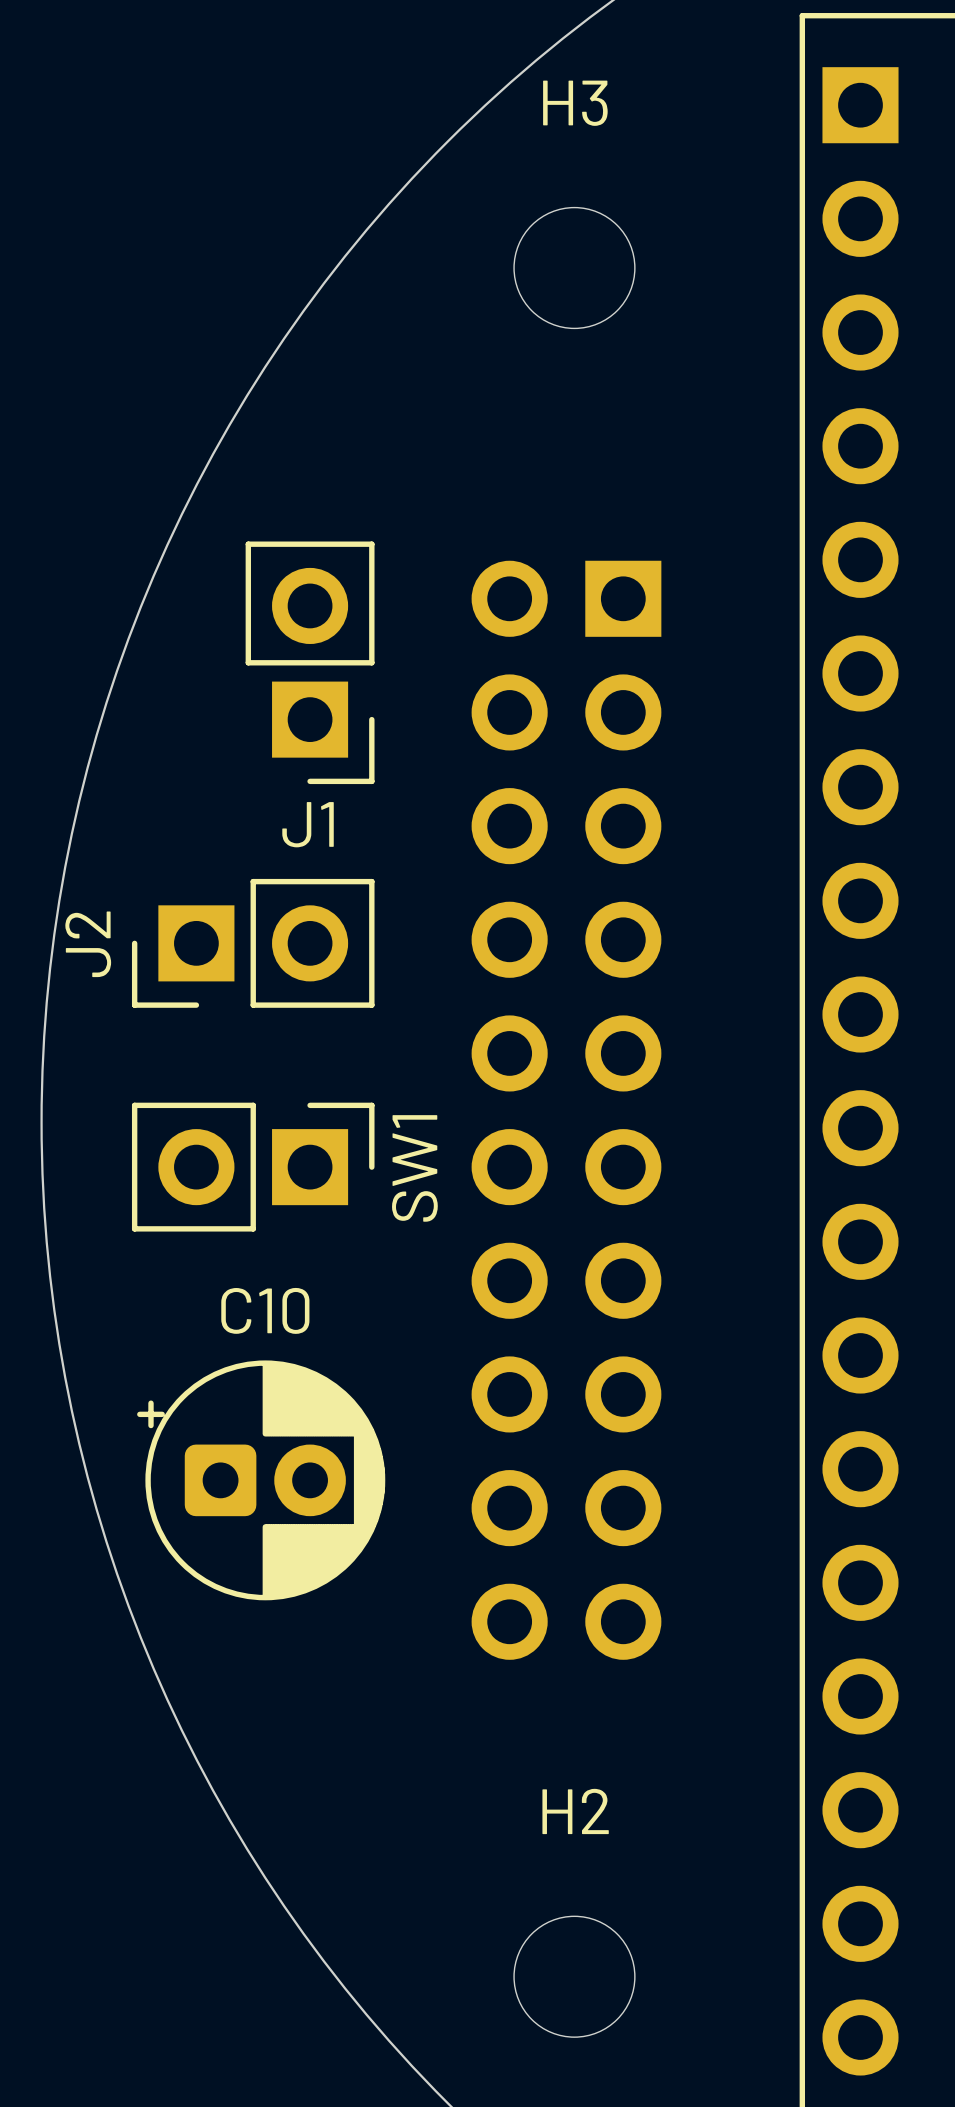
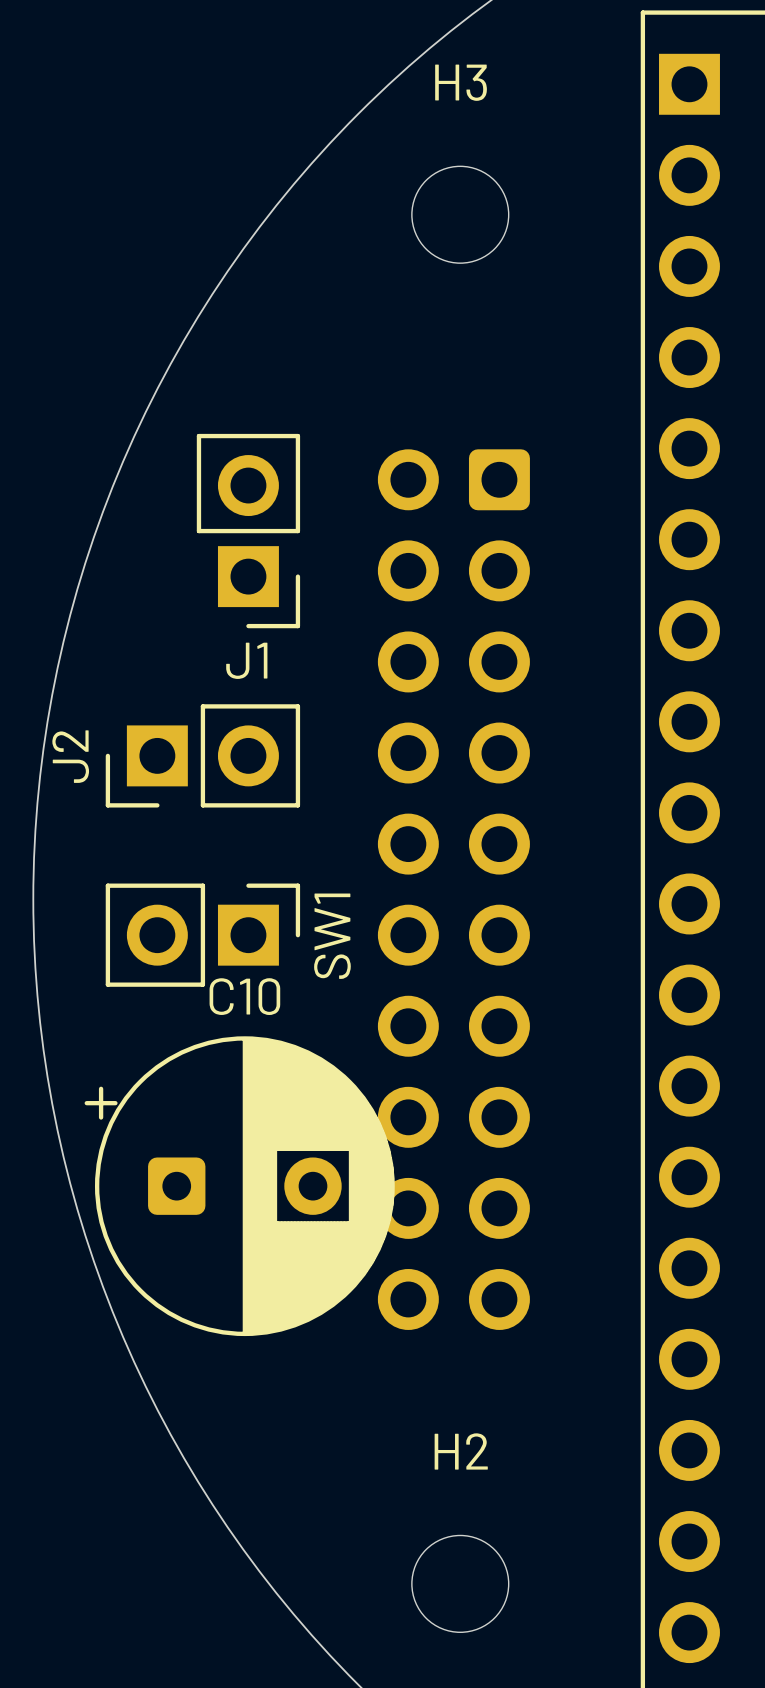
part footprint: [471, 560, 662, 1660] -> [377, 449, 530, 1330]
C10 footprint: [137, 1360, 386, 1601] -> [84, 1036, 395, 1337]

